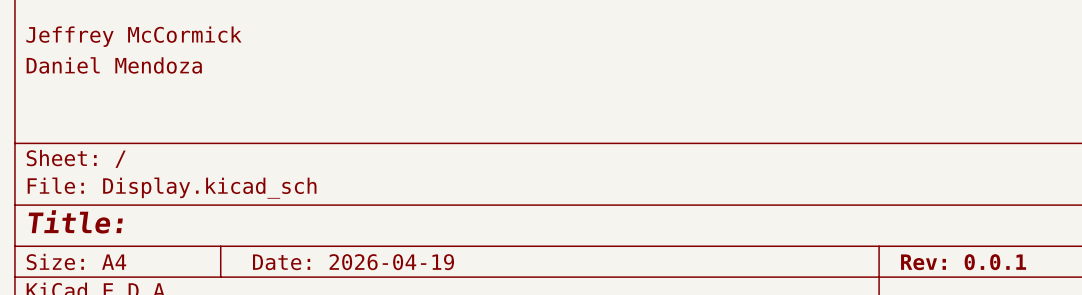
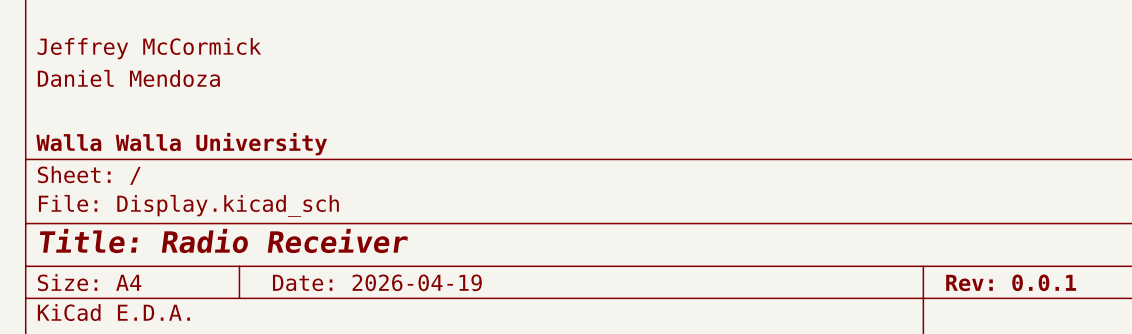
title block: none -> Walla Walla University (181, 144)
title block: Title: (75, 221) -> Title: Radio Receiver (223, 240)

